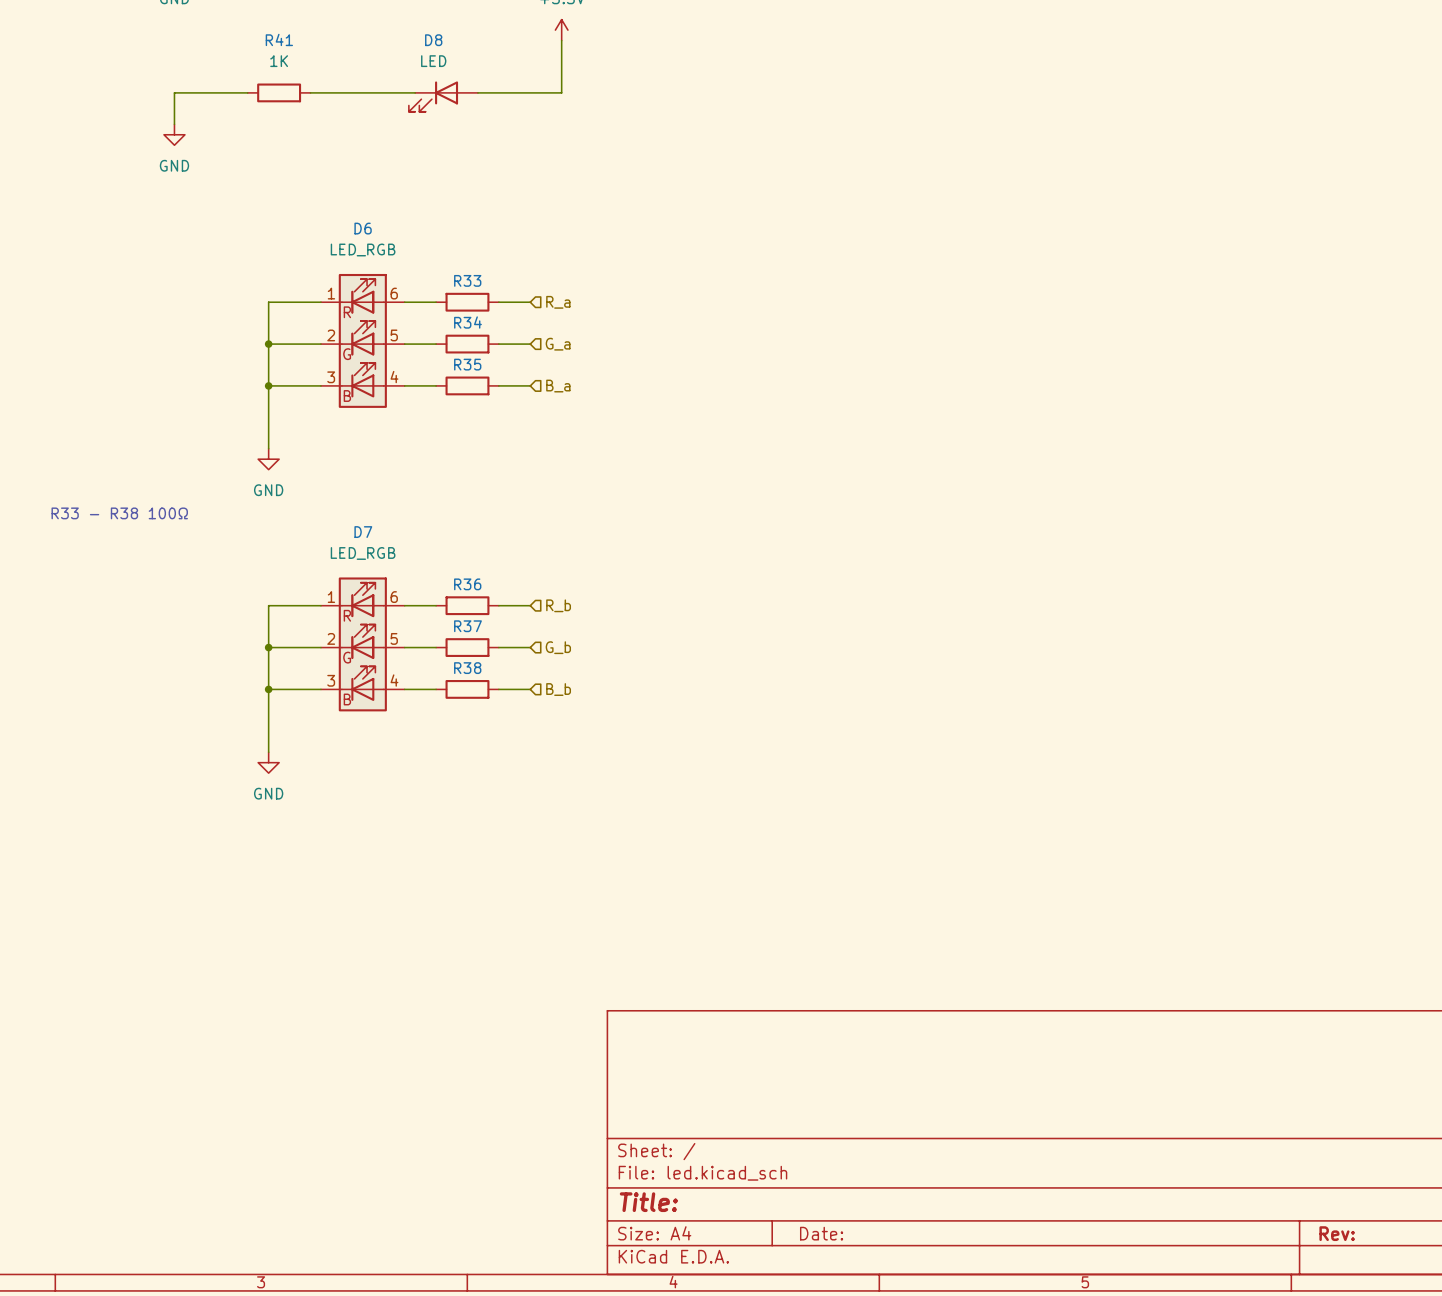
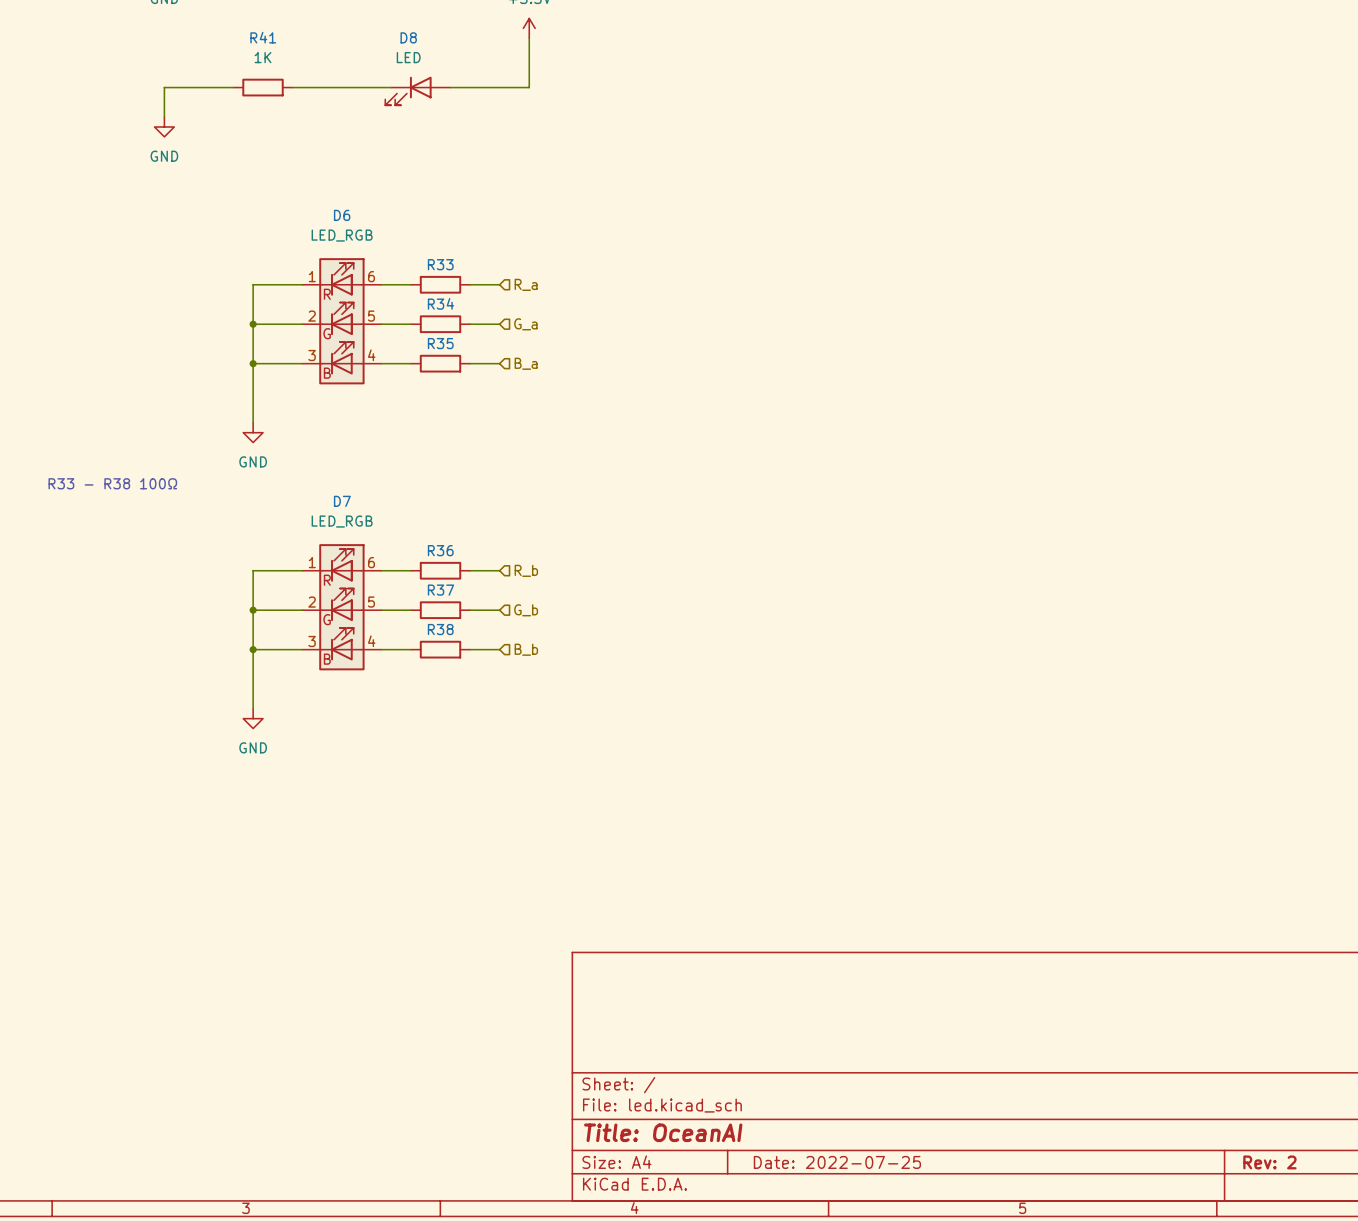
title block: Title: (648, 1202) -> Title: OceanAI (663, 1132)
title block: Date: (821, 1233) -> Date: 2022-07-25 (837, 1162)
title block: Rev: (1337, 1233) -> Rev: 2 (1269, 1162)

